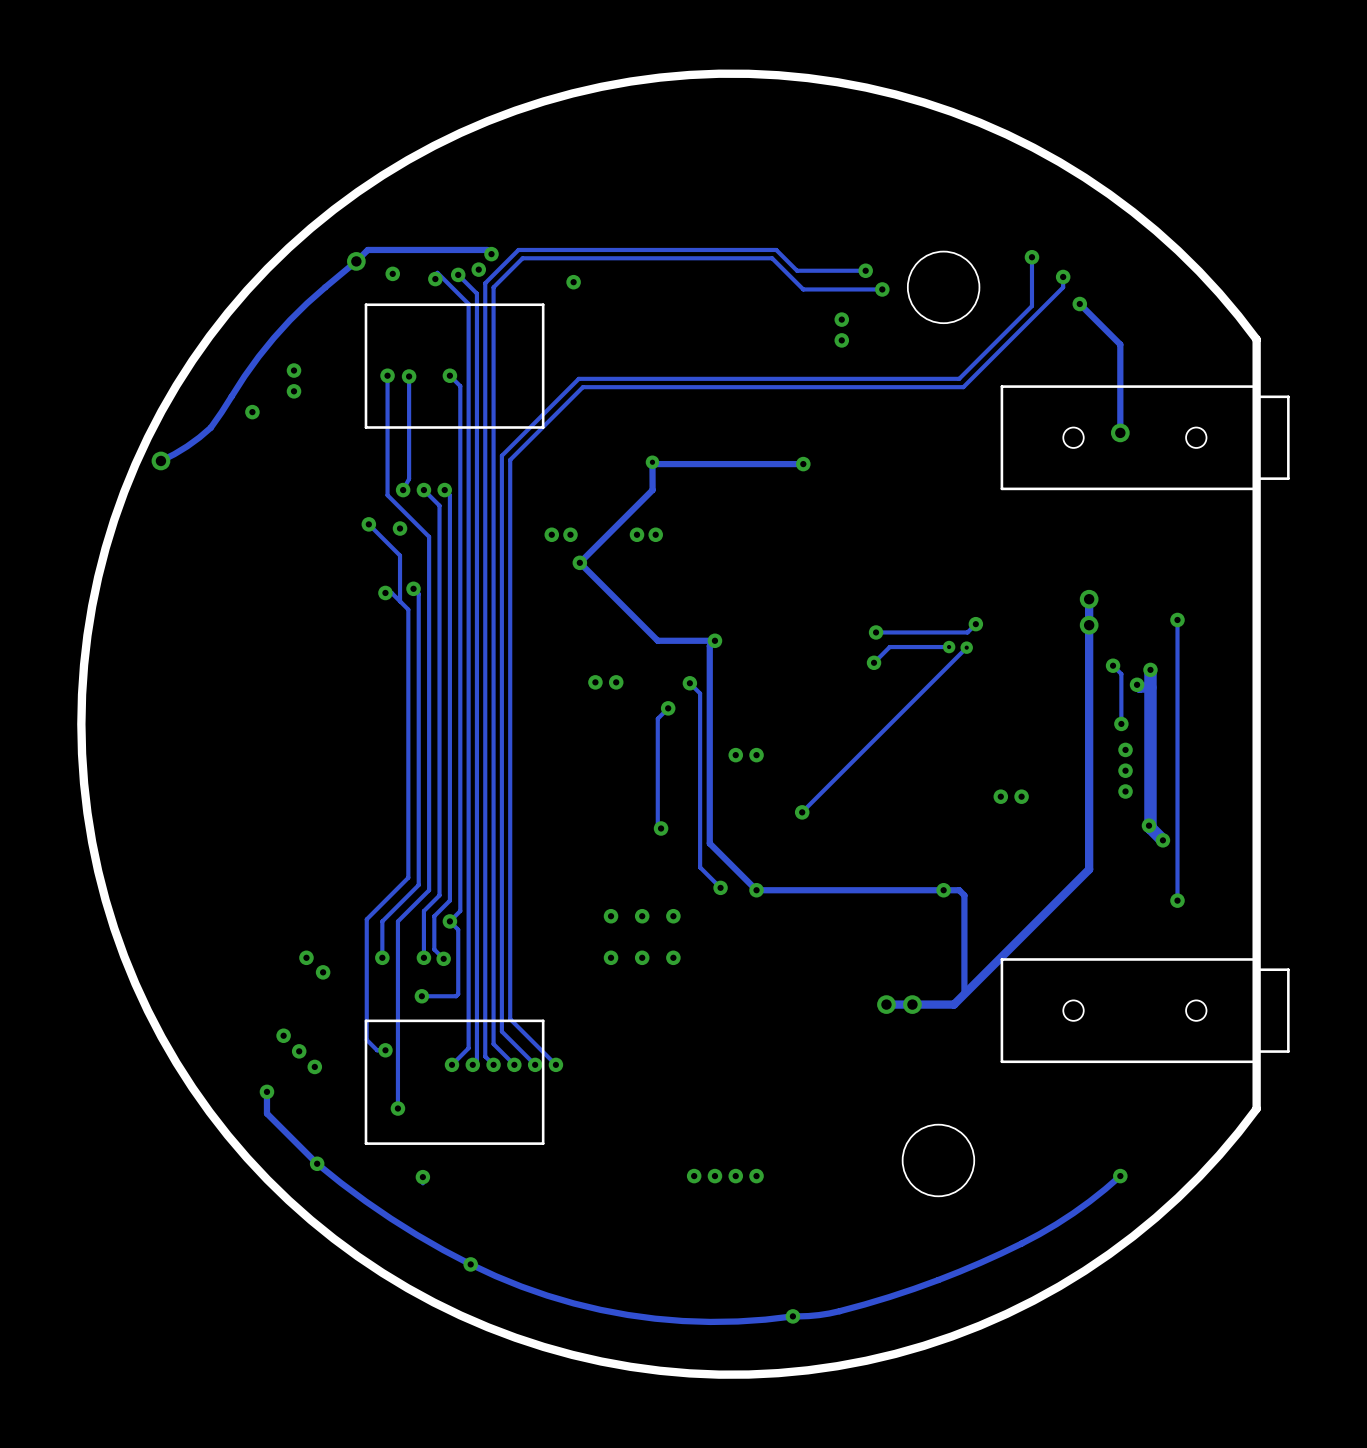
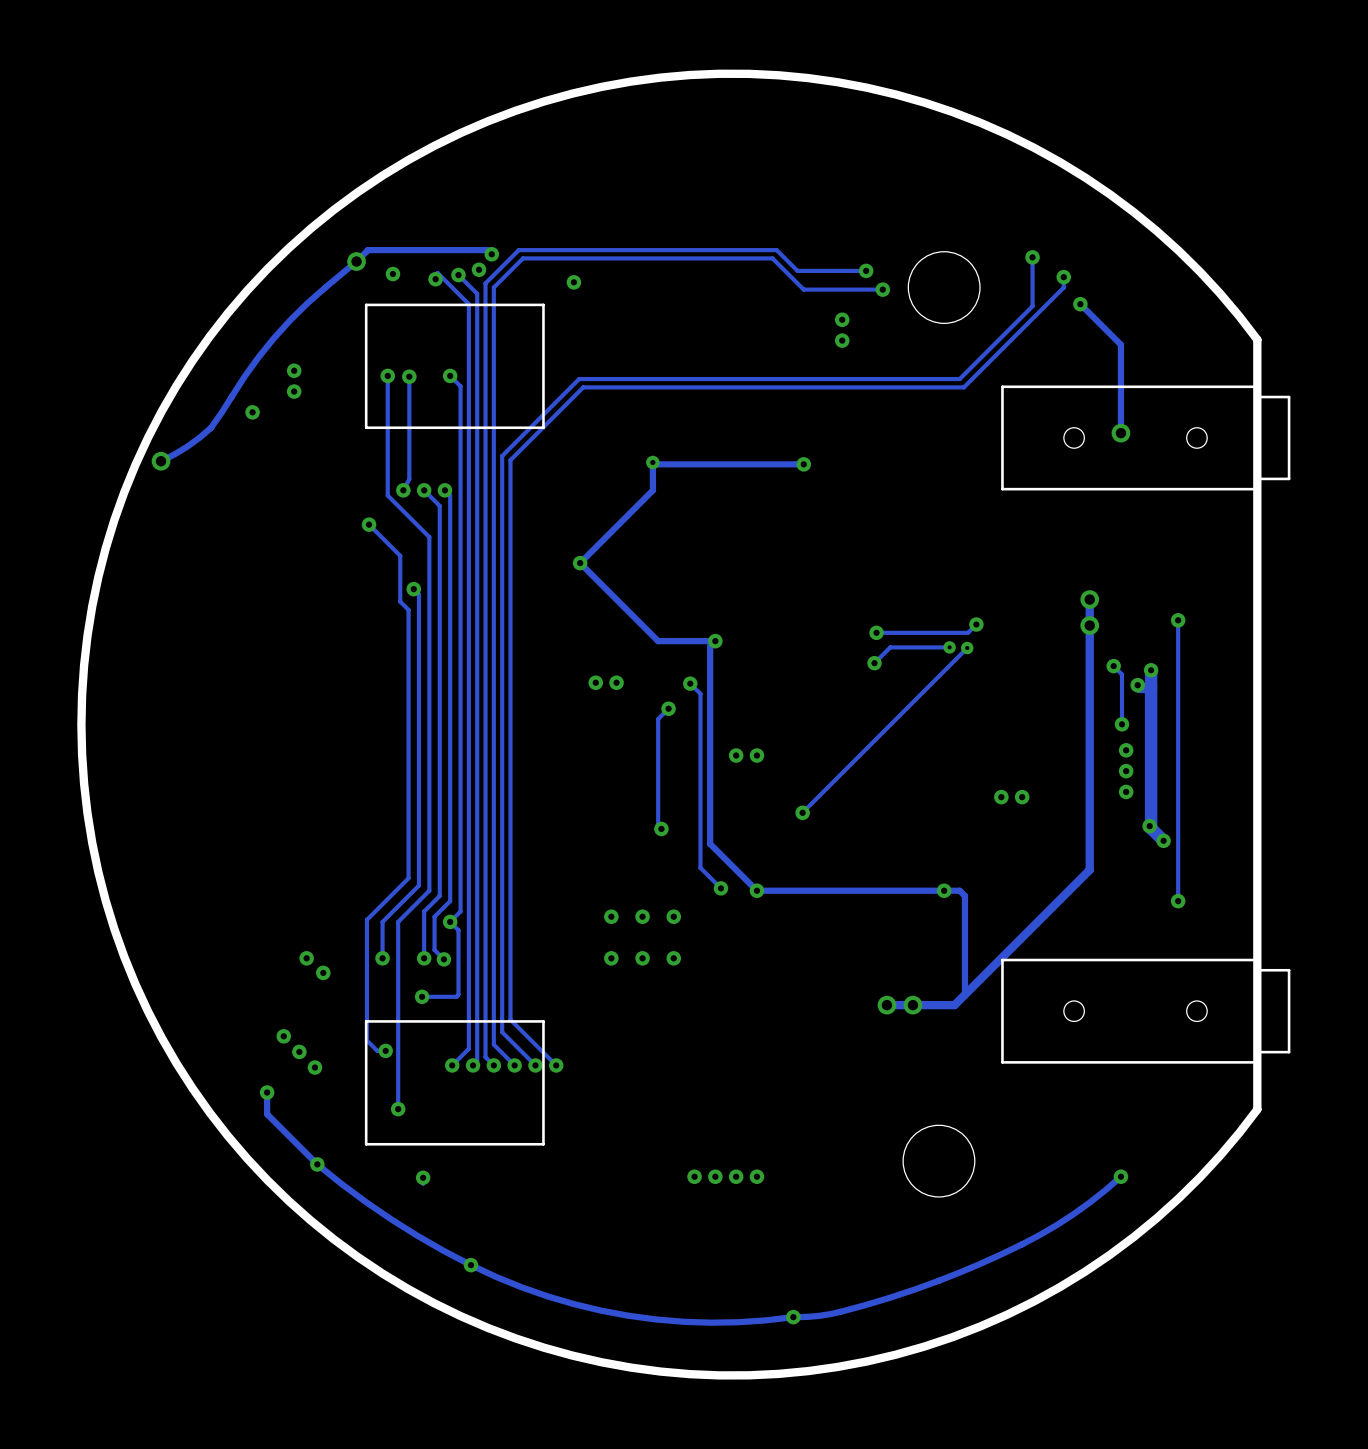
via: (400, 528) -> none
via: (551, 534) -> none
via: (570, 534) -> none
via: (637, 534) -> none
via: (655, 534) -> none
track: (385, 592) (391, 592) (400, 601) -> none
via: (385, 592) -> none

